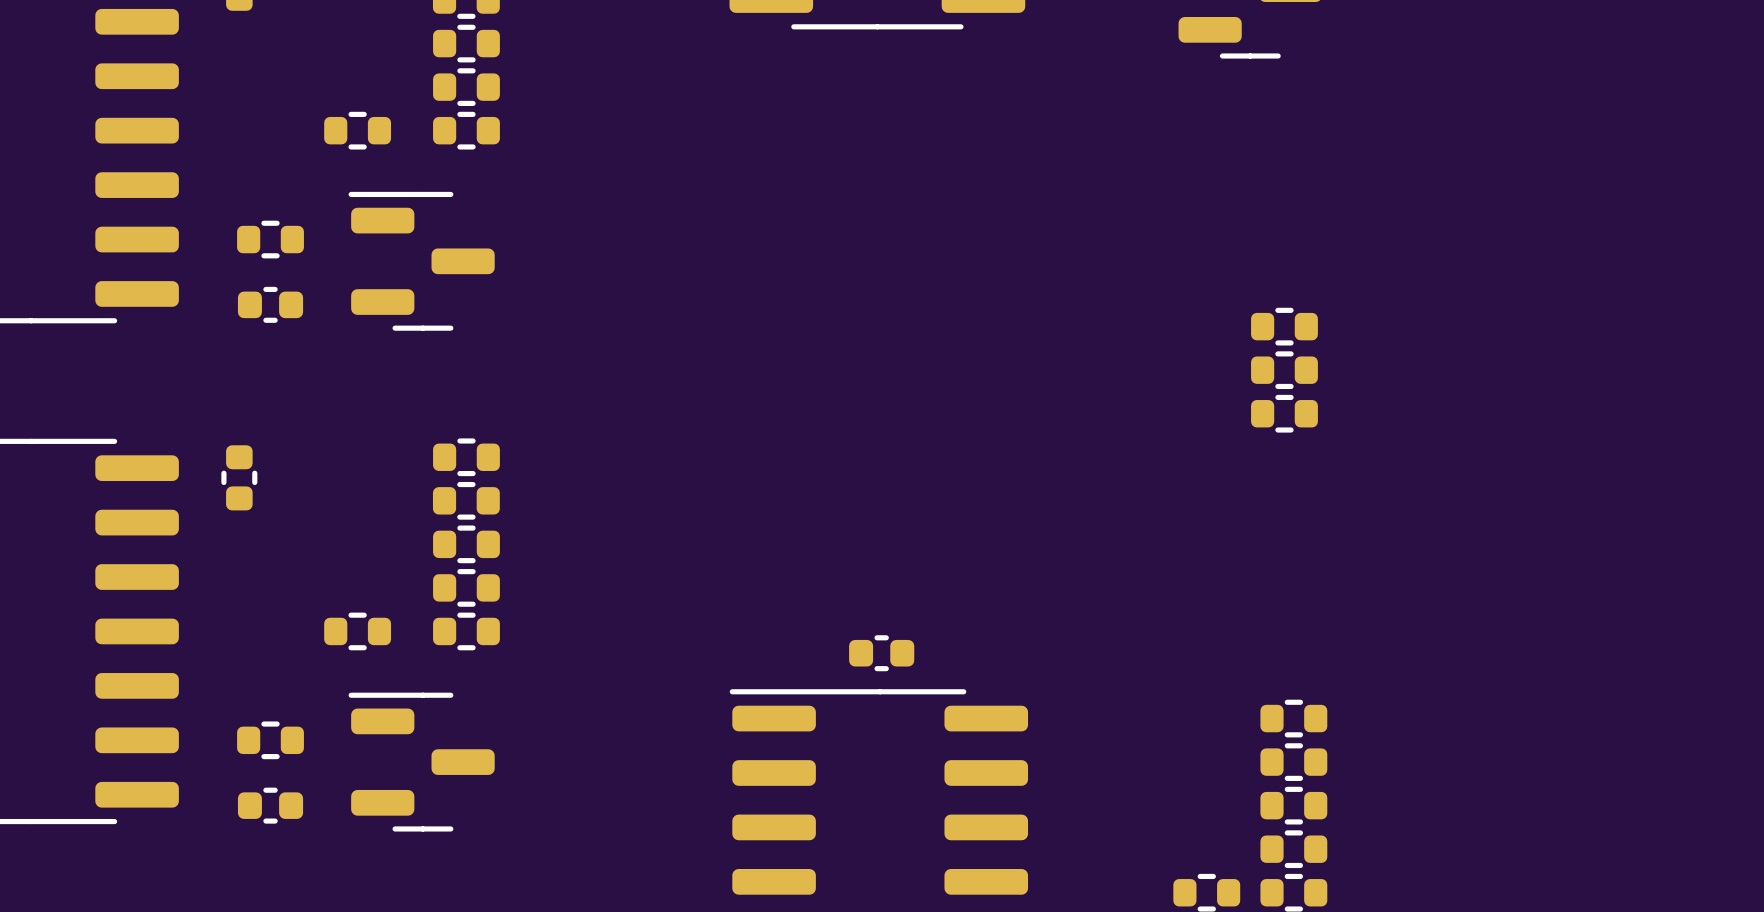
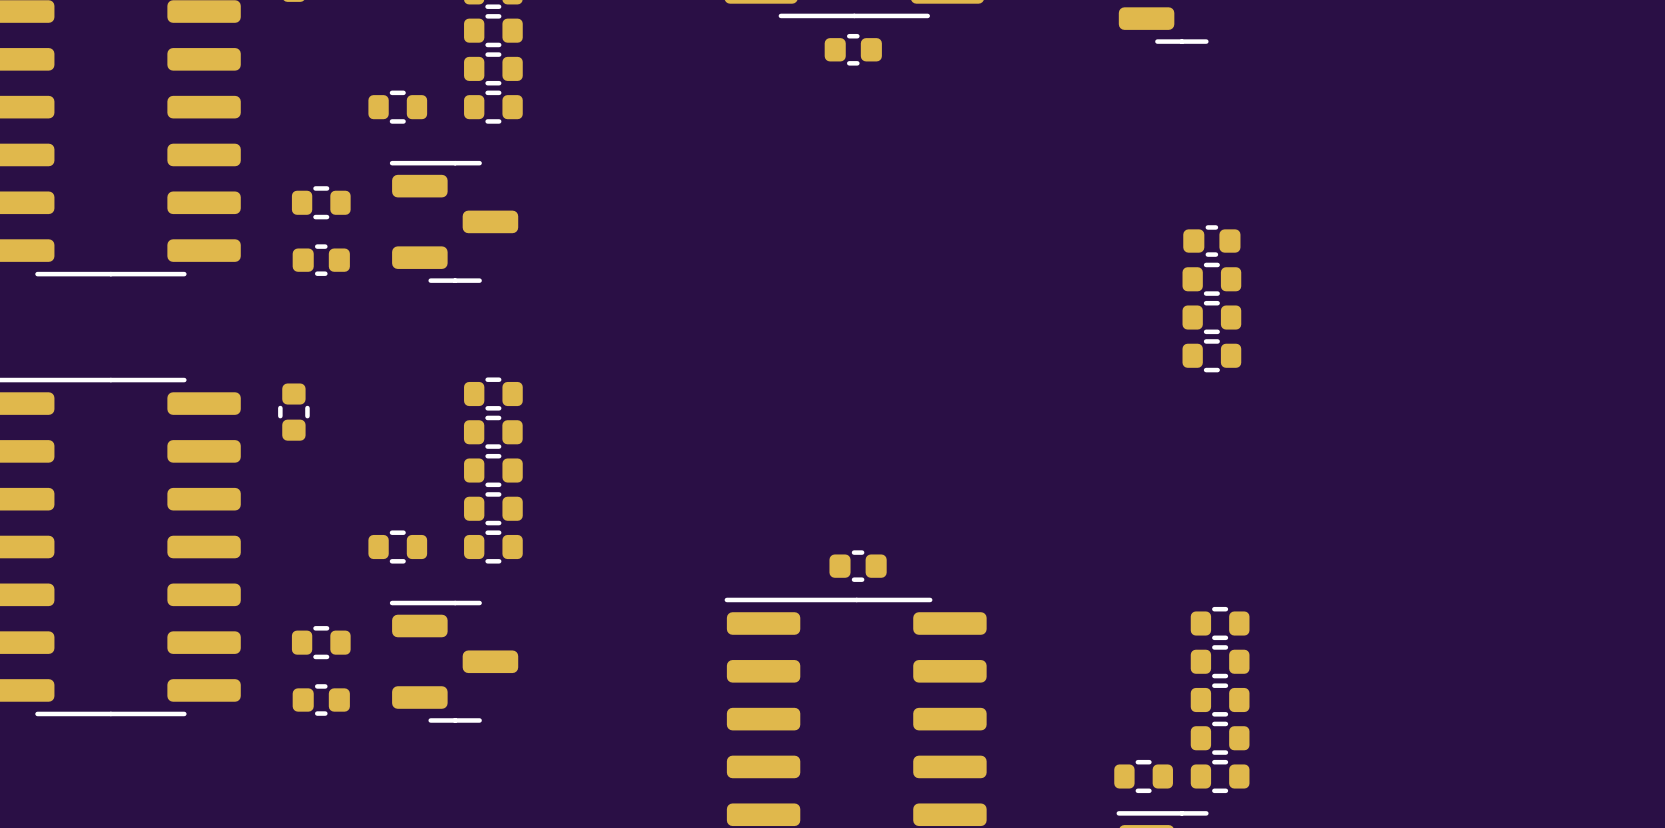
part: none -> (853, 49)
part: none -> (1211, 241)

